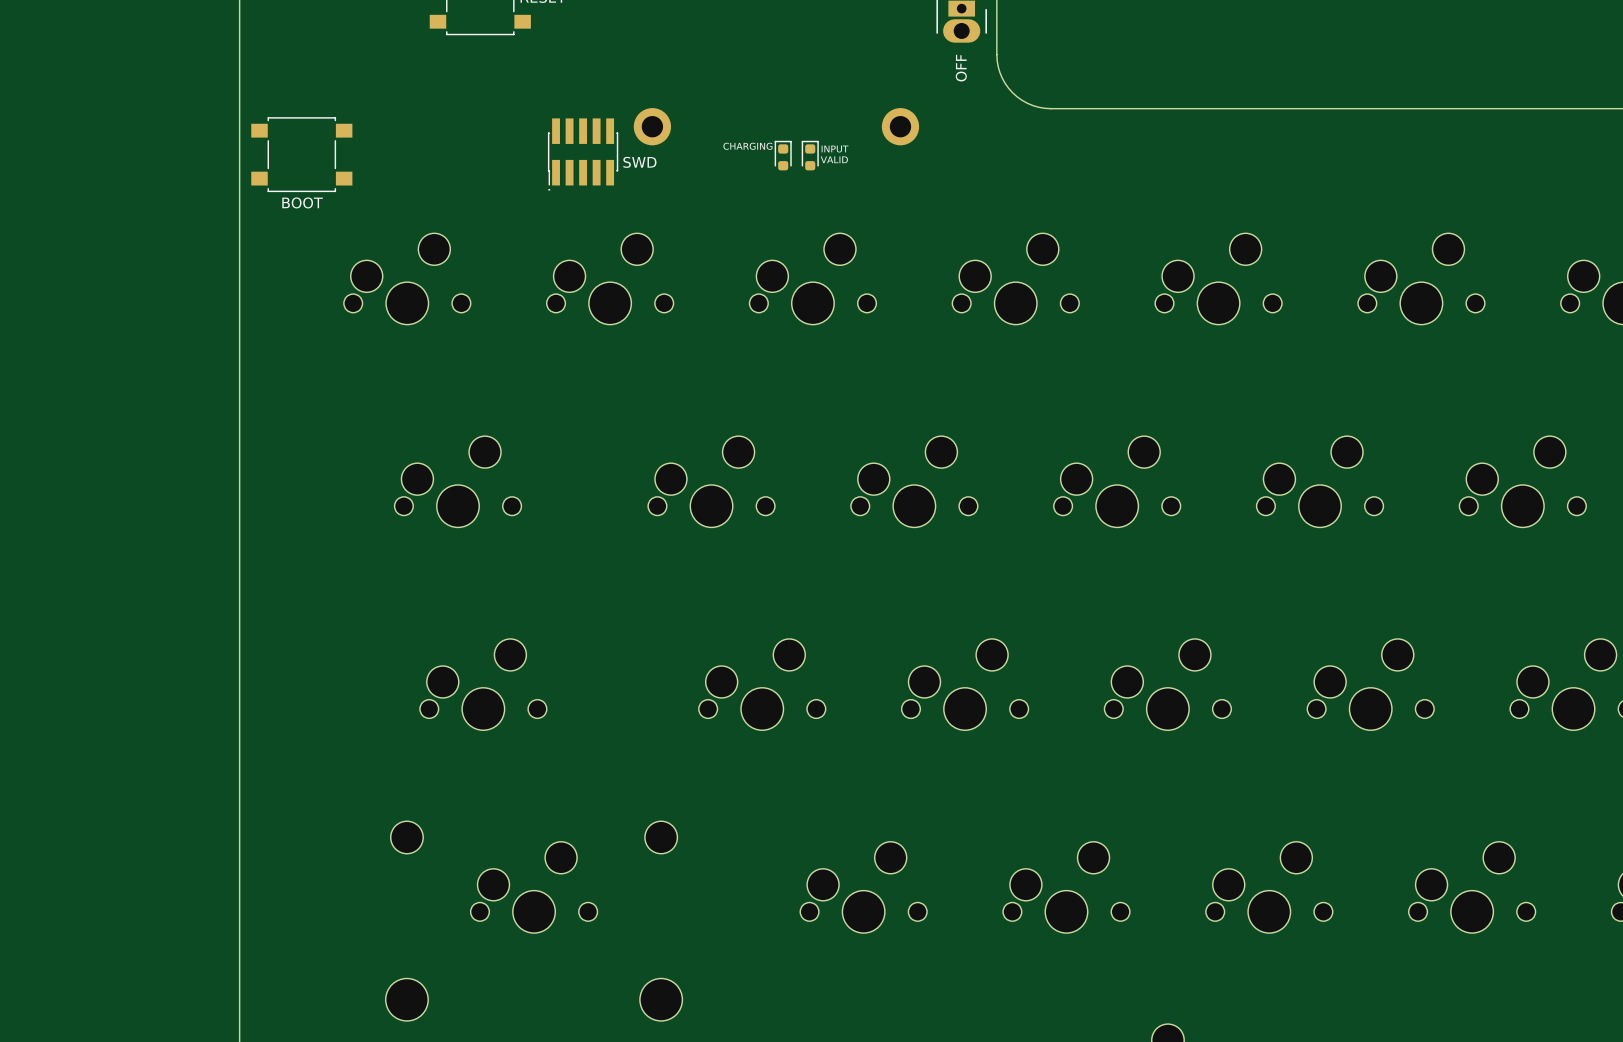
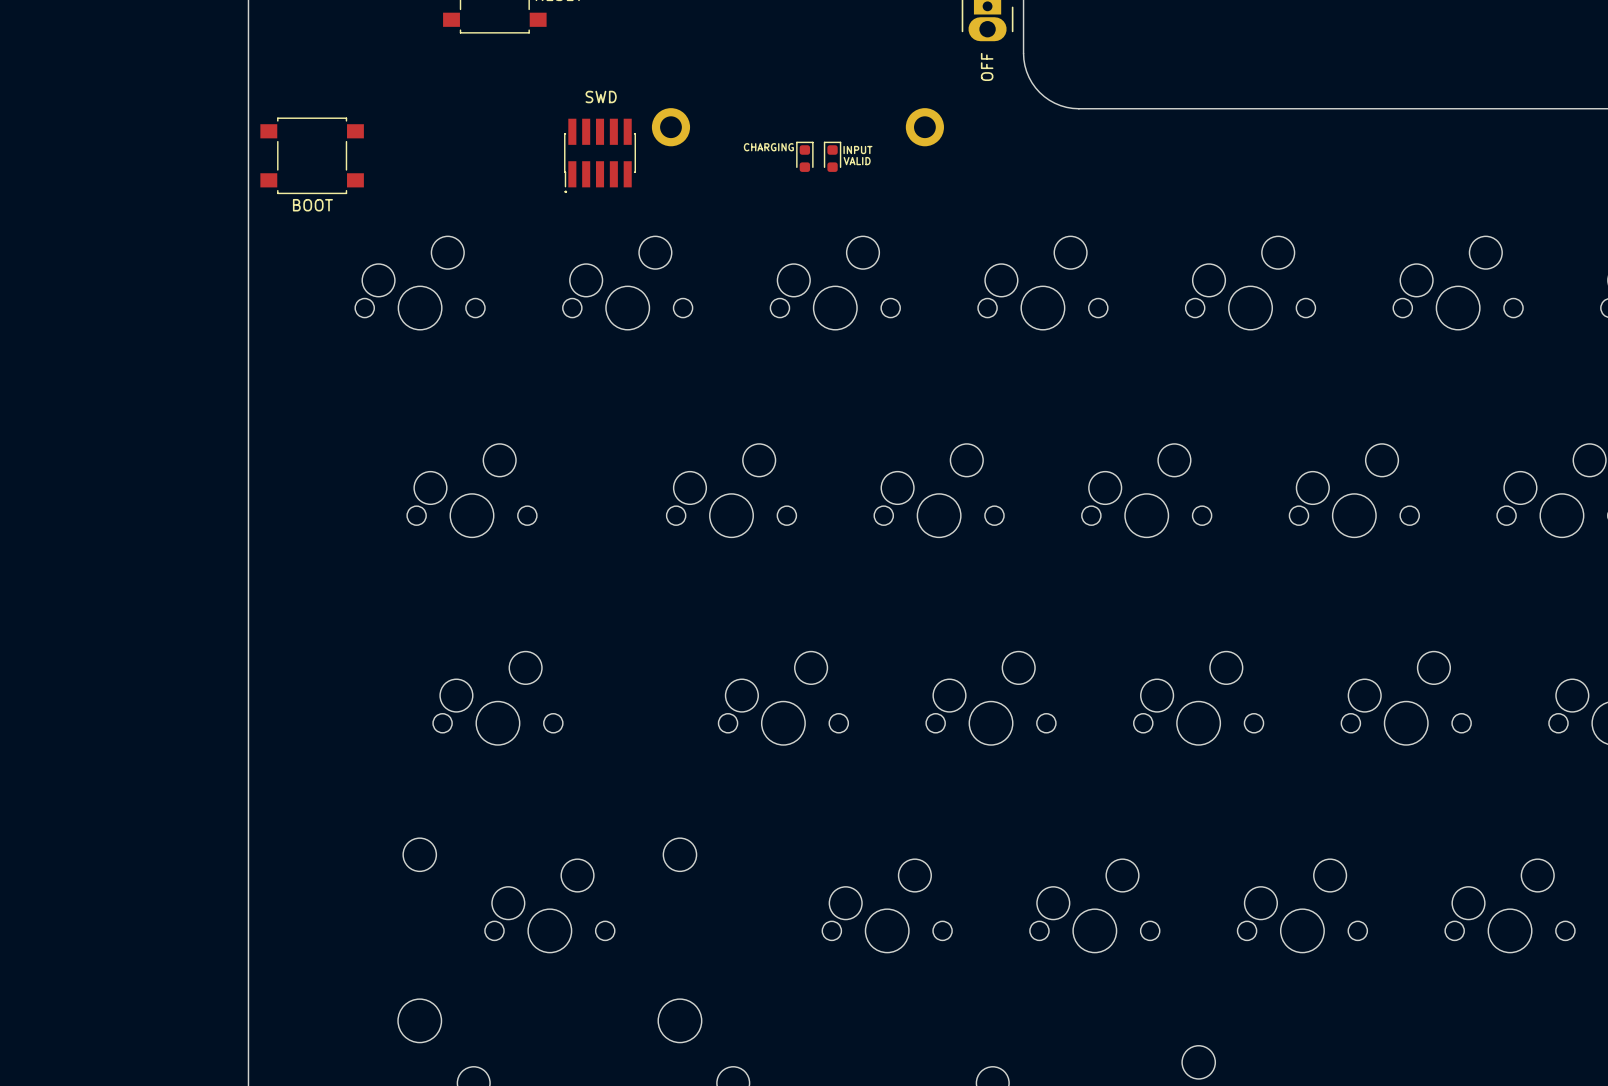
part text position: SWD (639, 162) -> SWD (601, 97)

